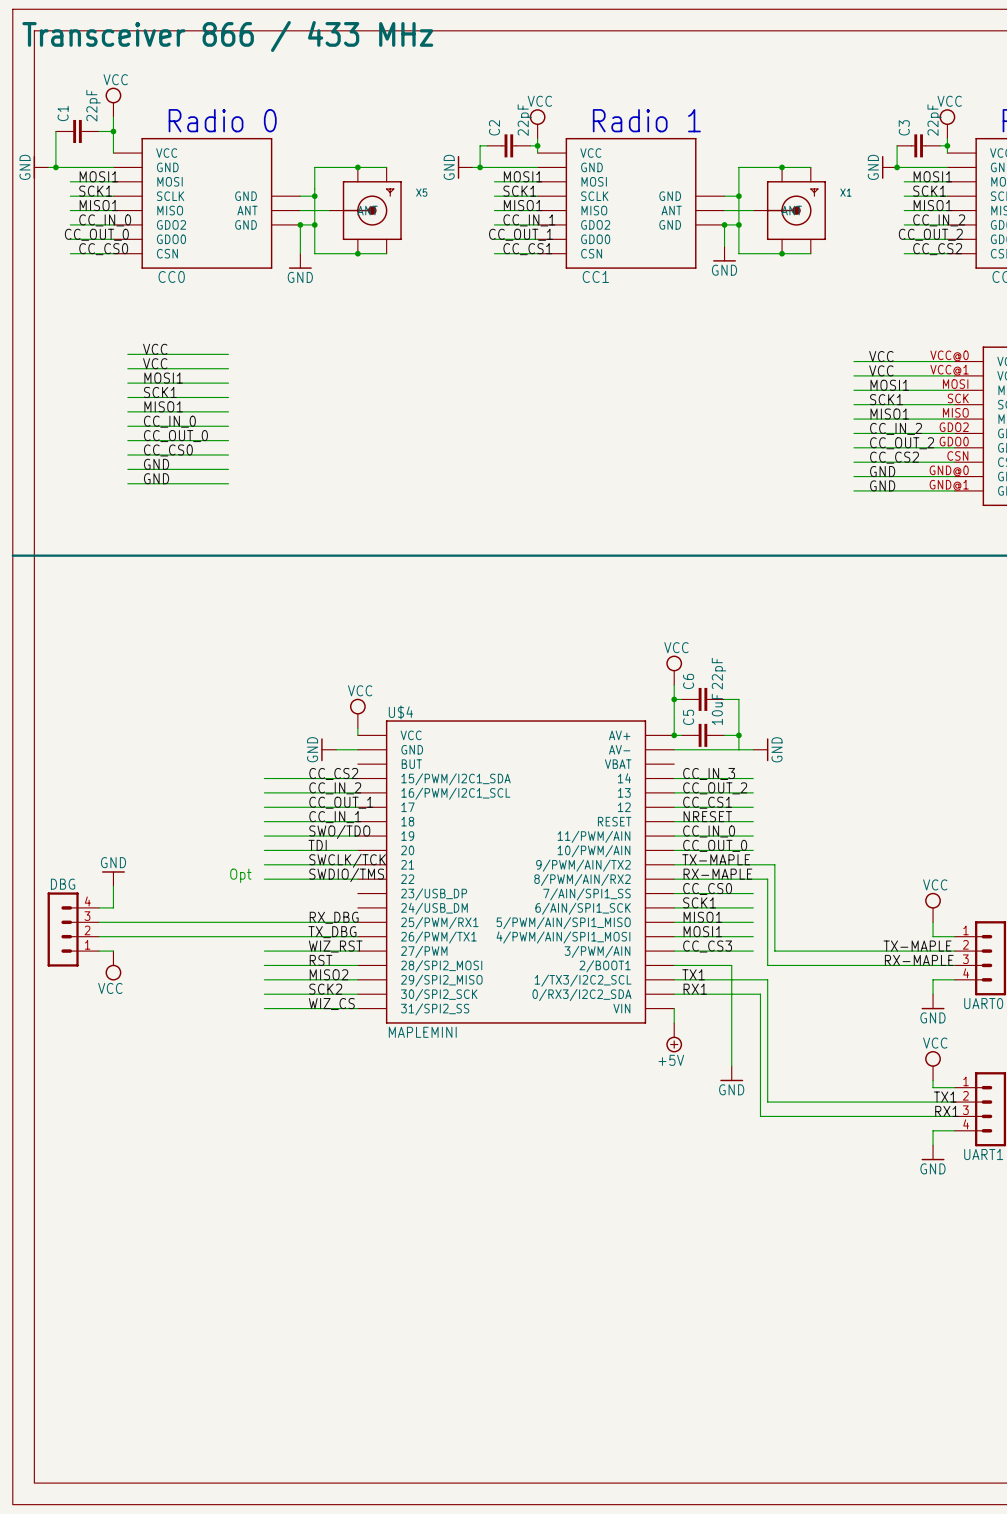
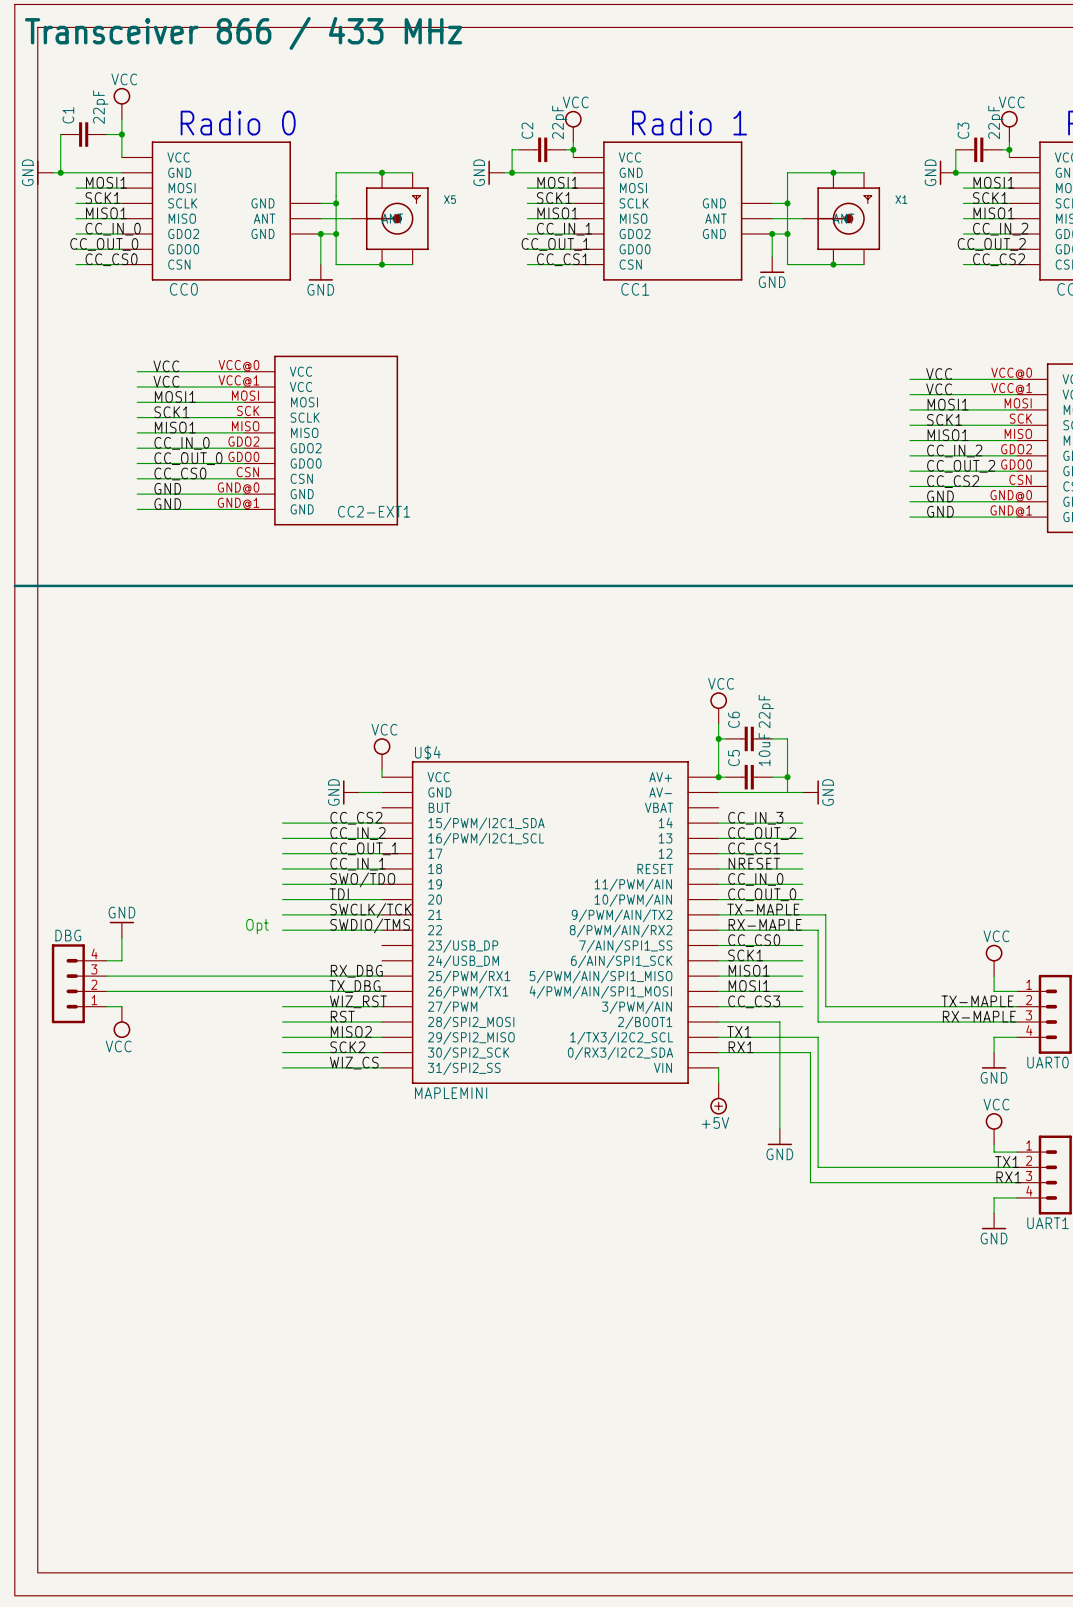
CC2-EXT1: none -> (321, 440)

